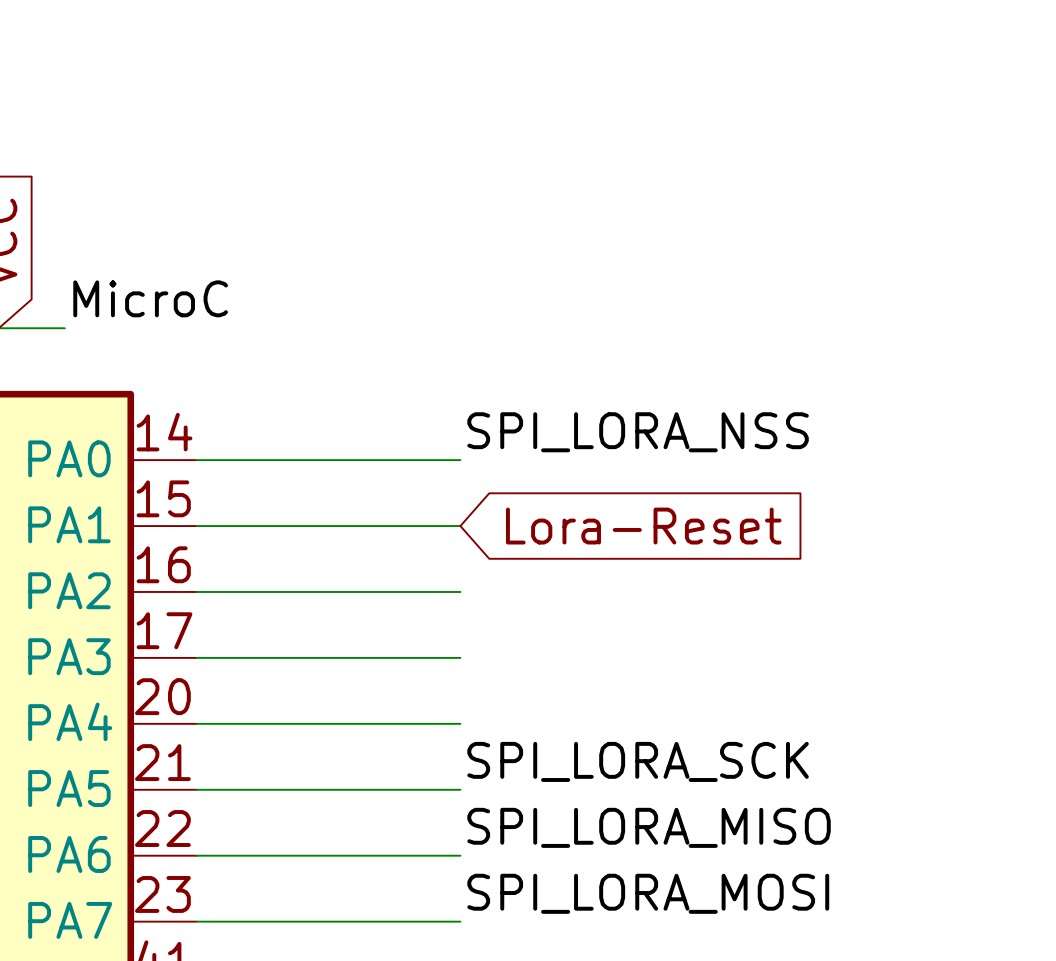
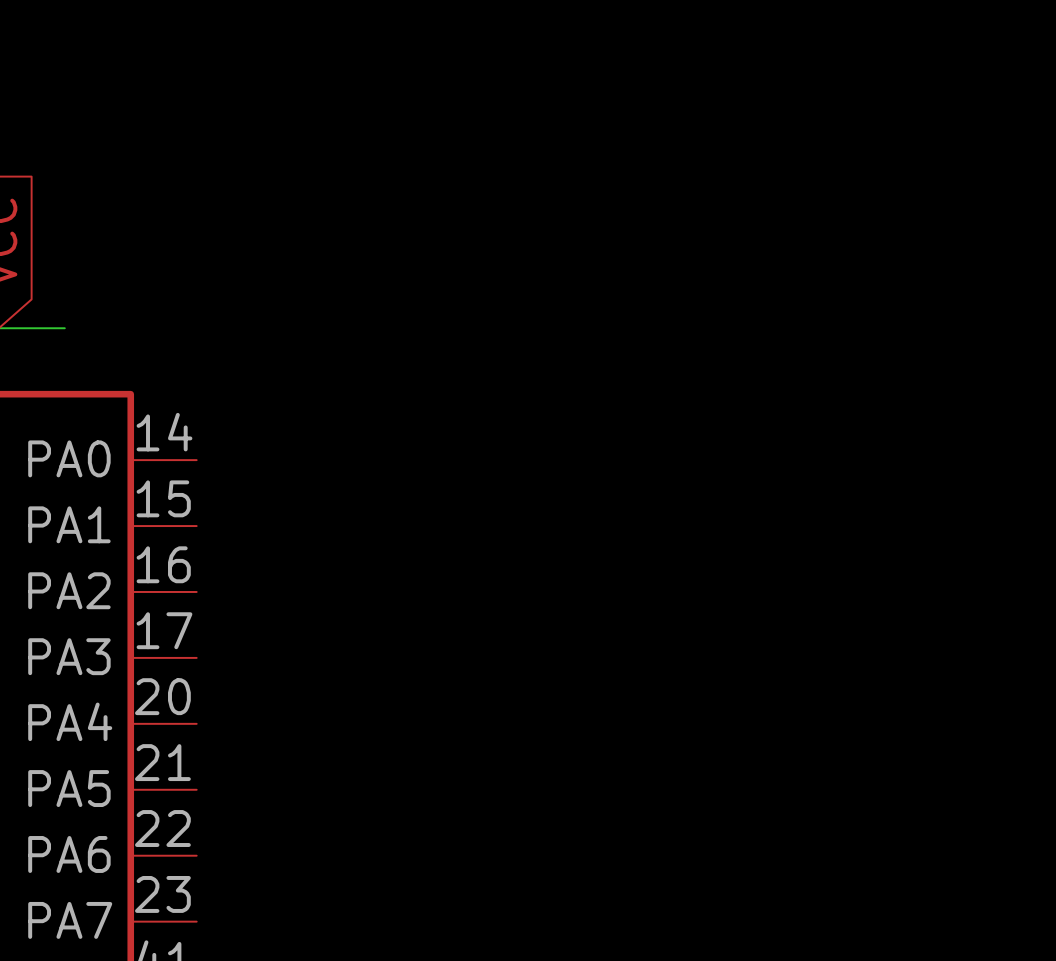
label: MicroC (150, 298) -> none
label: SPI_LORA_NSS (638, 432) -> none
wire: (196, 460) (460, 460) -> none
wire: (196, 526) (460, 526) -> none
global label: Lora-Reset (643, 526) -> none
wire: (196, 591) (460, 591) -> none
wire: (196, 657) (460, 657) -> none
wire: (196, 723) (460, 723) -> none
label: SPI_LORA_SCK (638, 761) -> none
wire: (196, 789) (460, 789) -> none
label: SPI_LORA_MISO (649, 827) -> none
wire: (196, 855) (460, 855) -> none
label: SPI_LORA_MOSI (648, 893) -> none
wire: (196, 921) (460, 921) -> none

